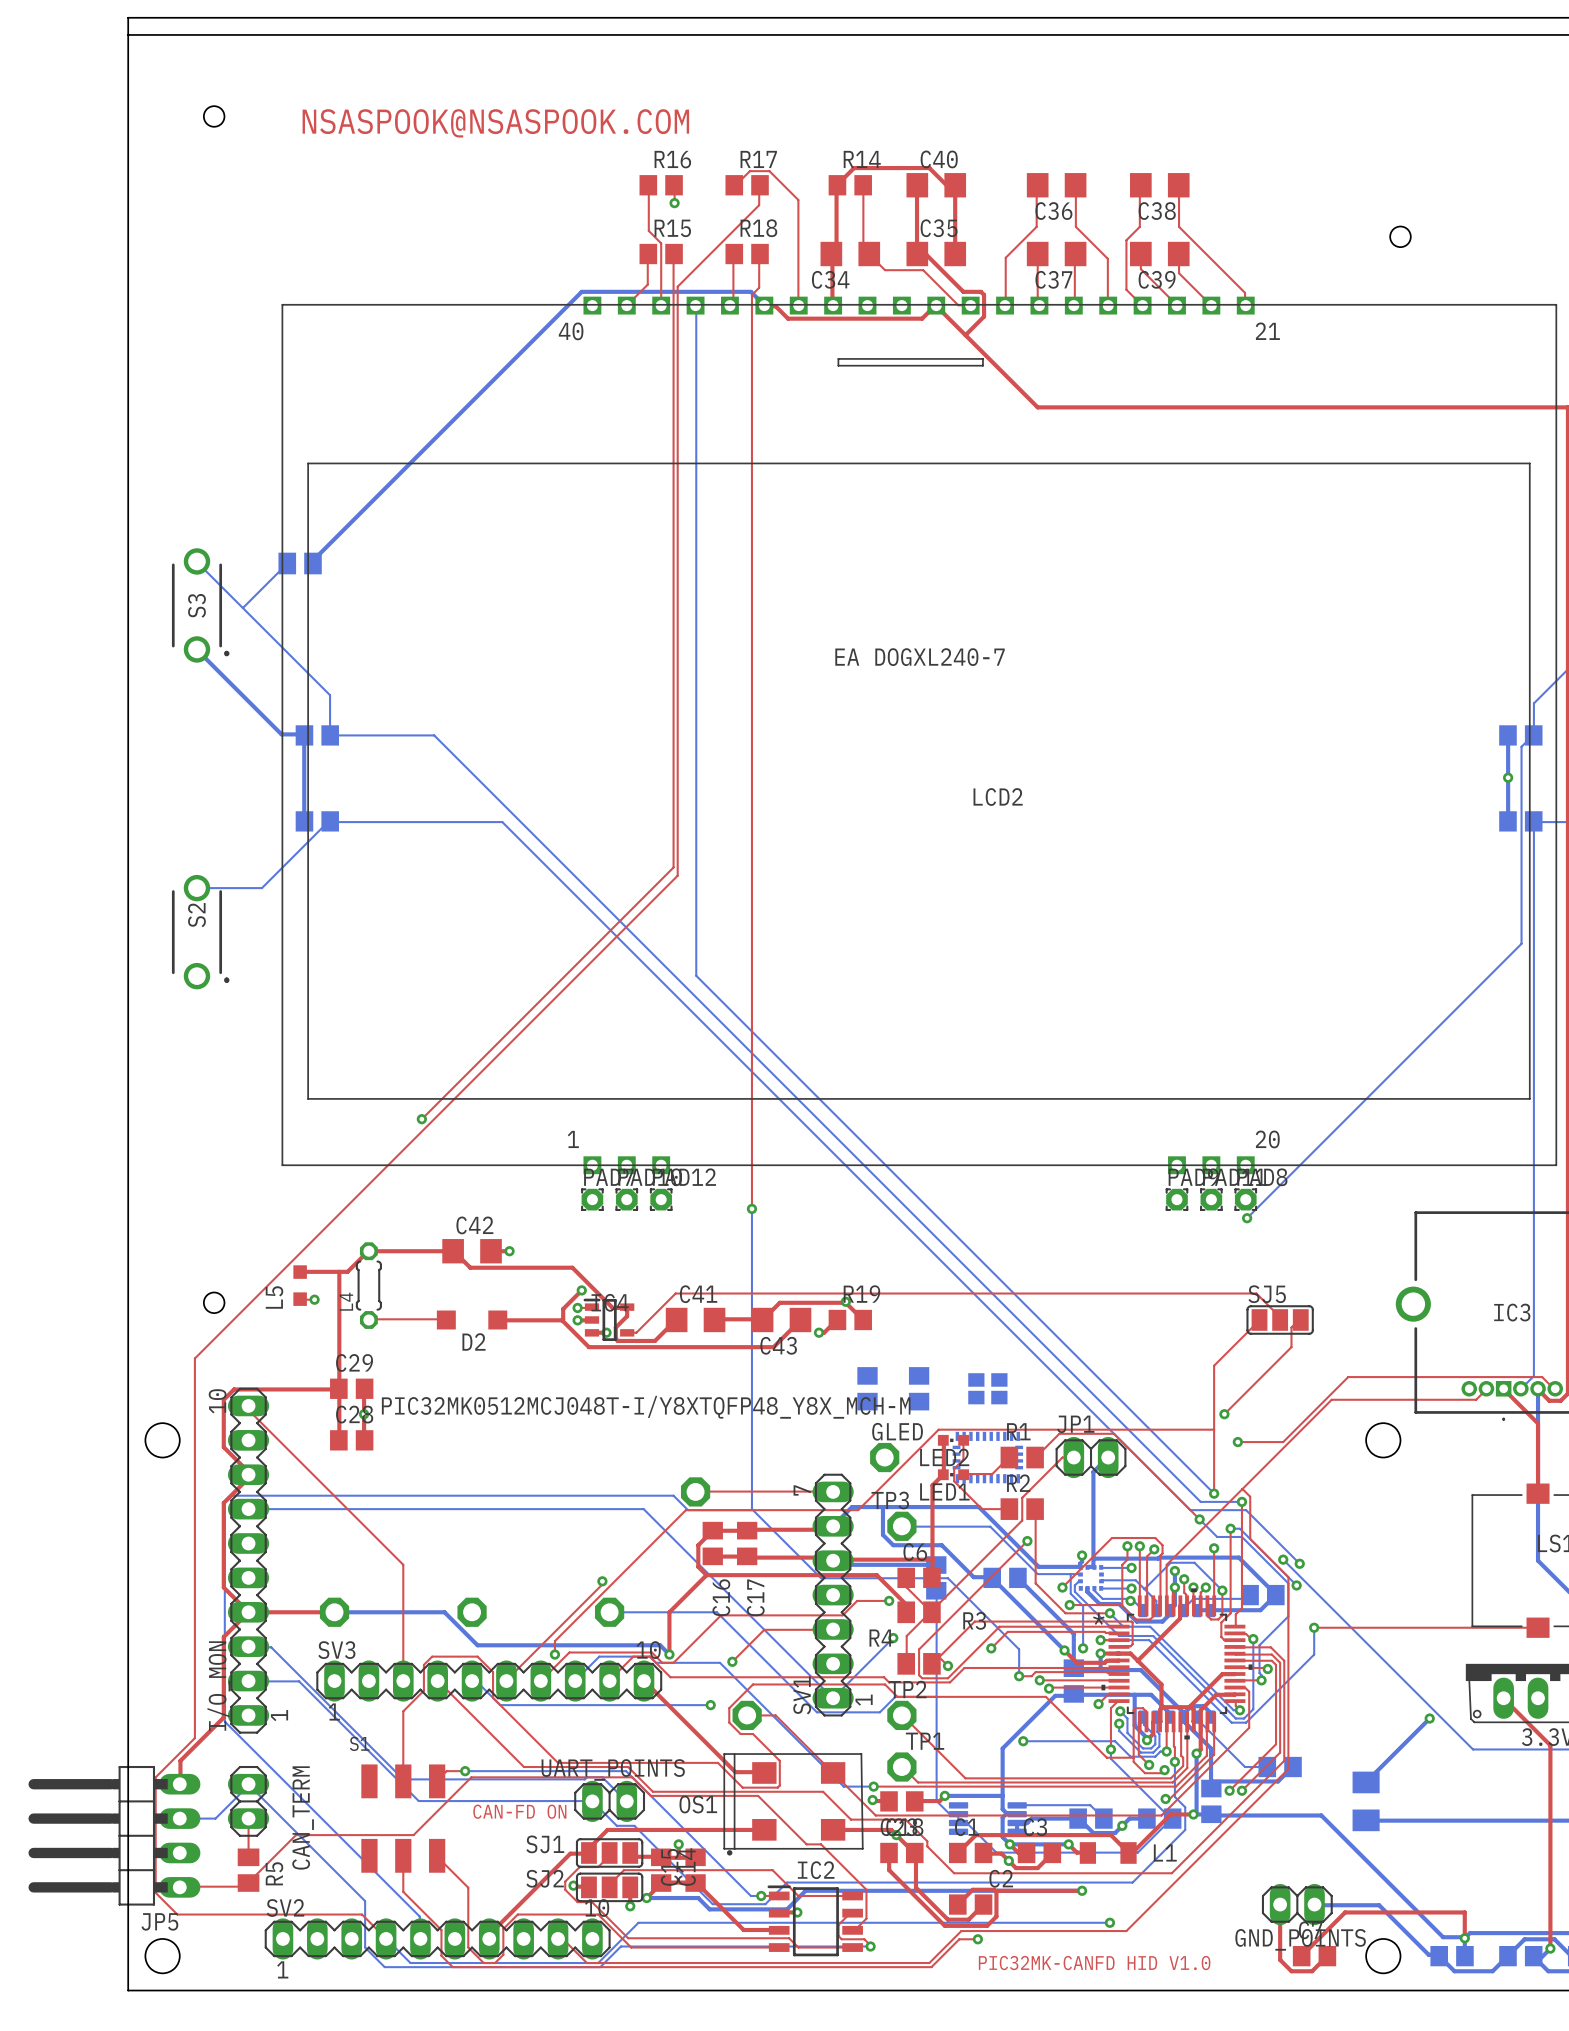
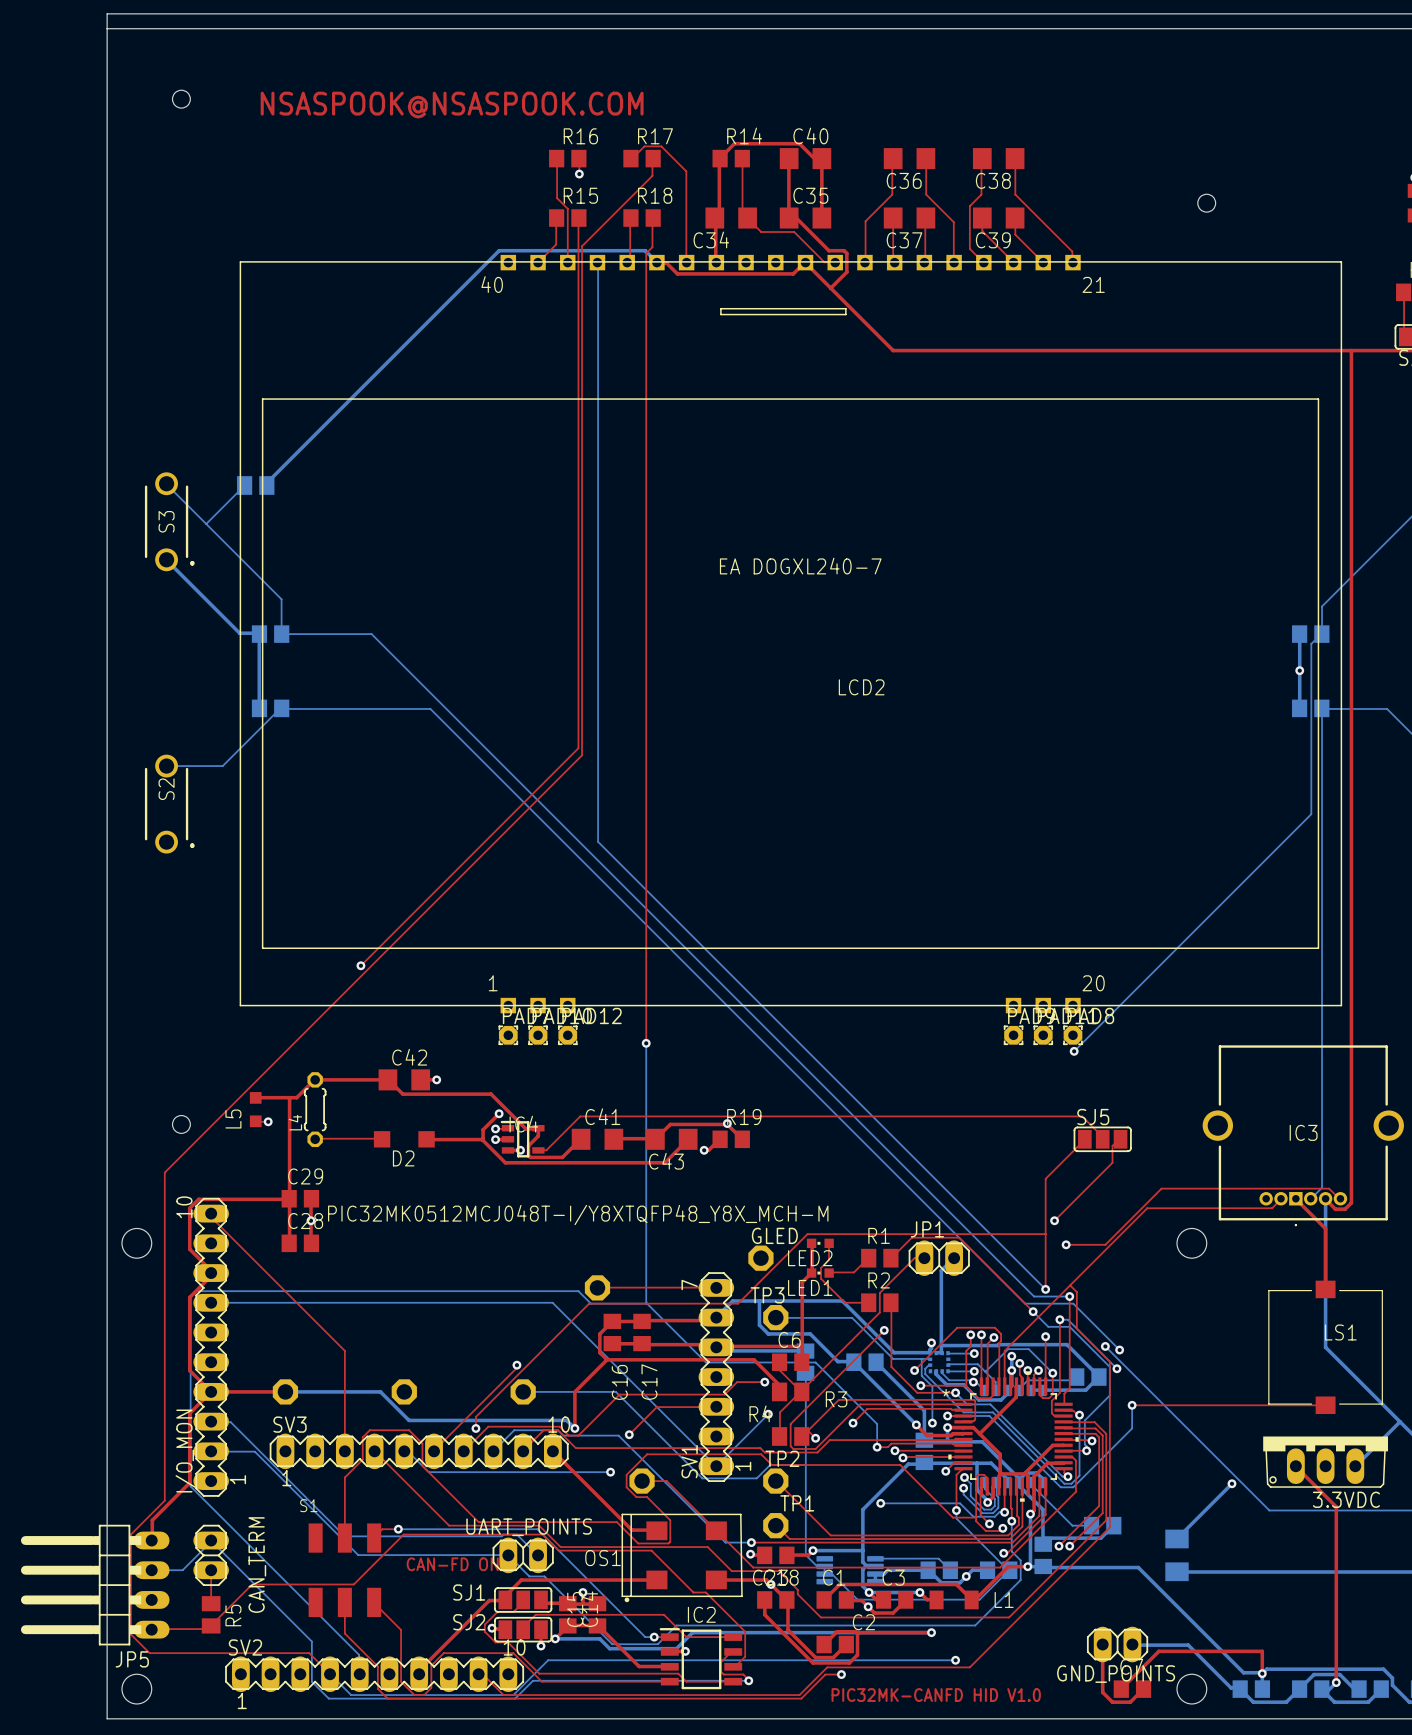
part: (867, 1388) -> none
part: (919, 1388) -> none
part: (987, 1388) -> none
part: (987, 1457) -> none

